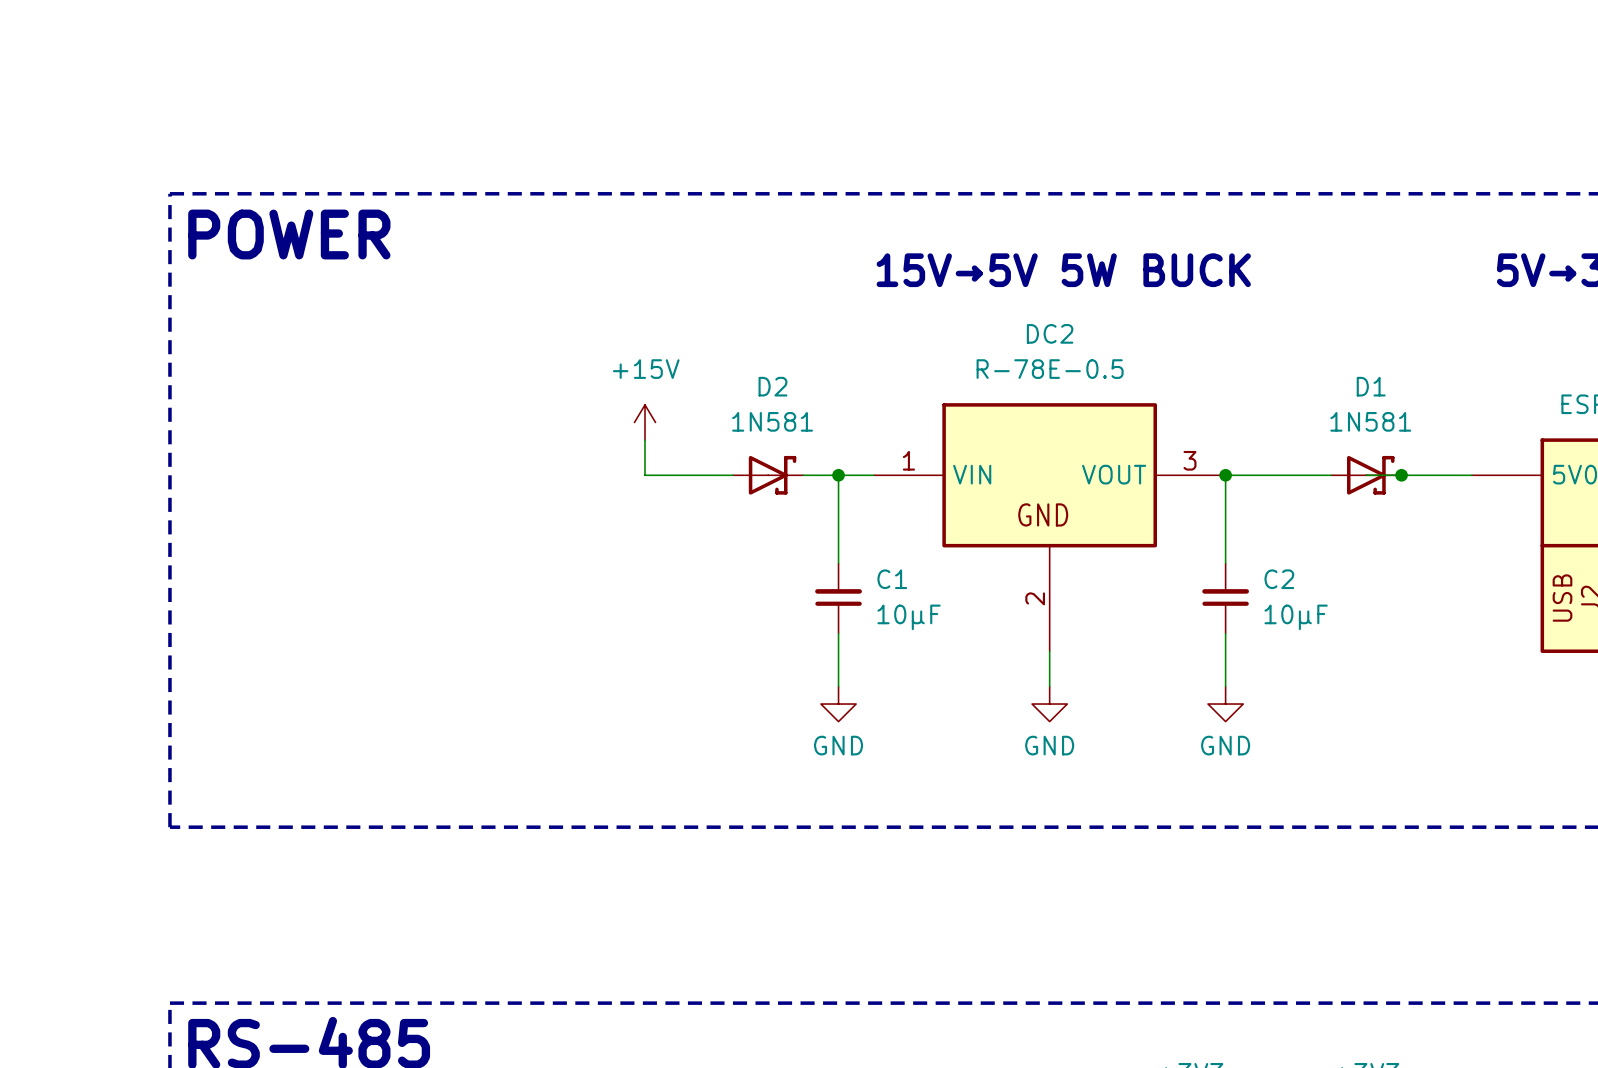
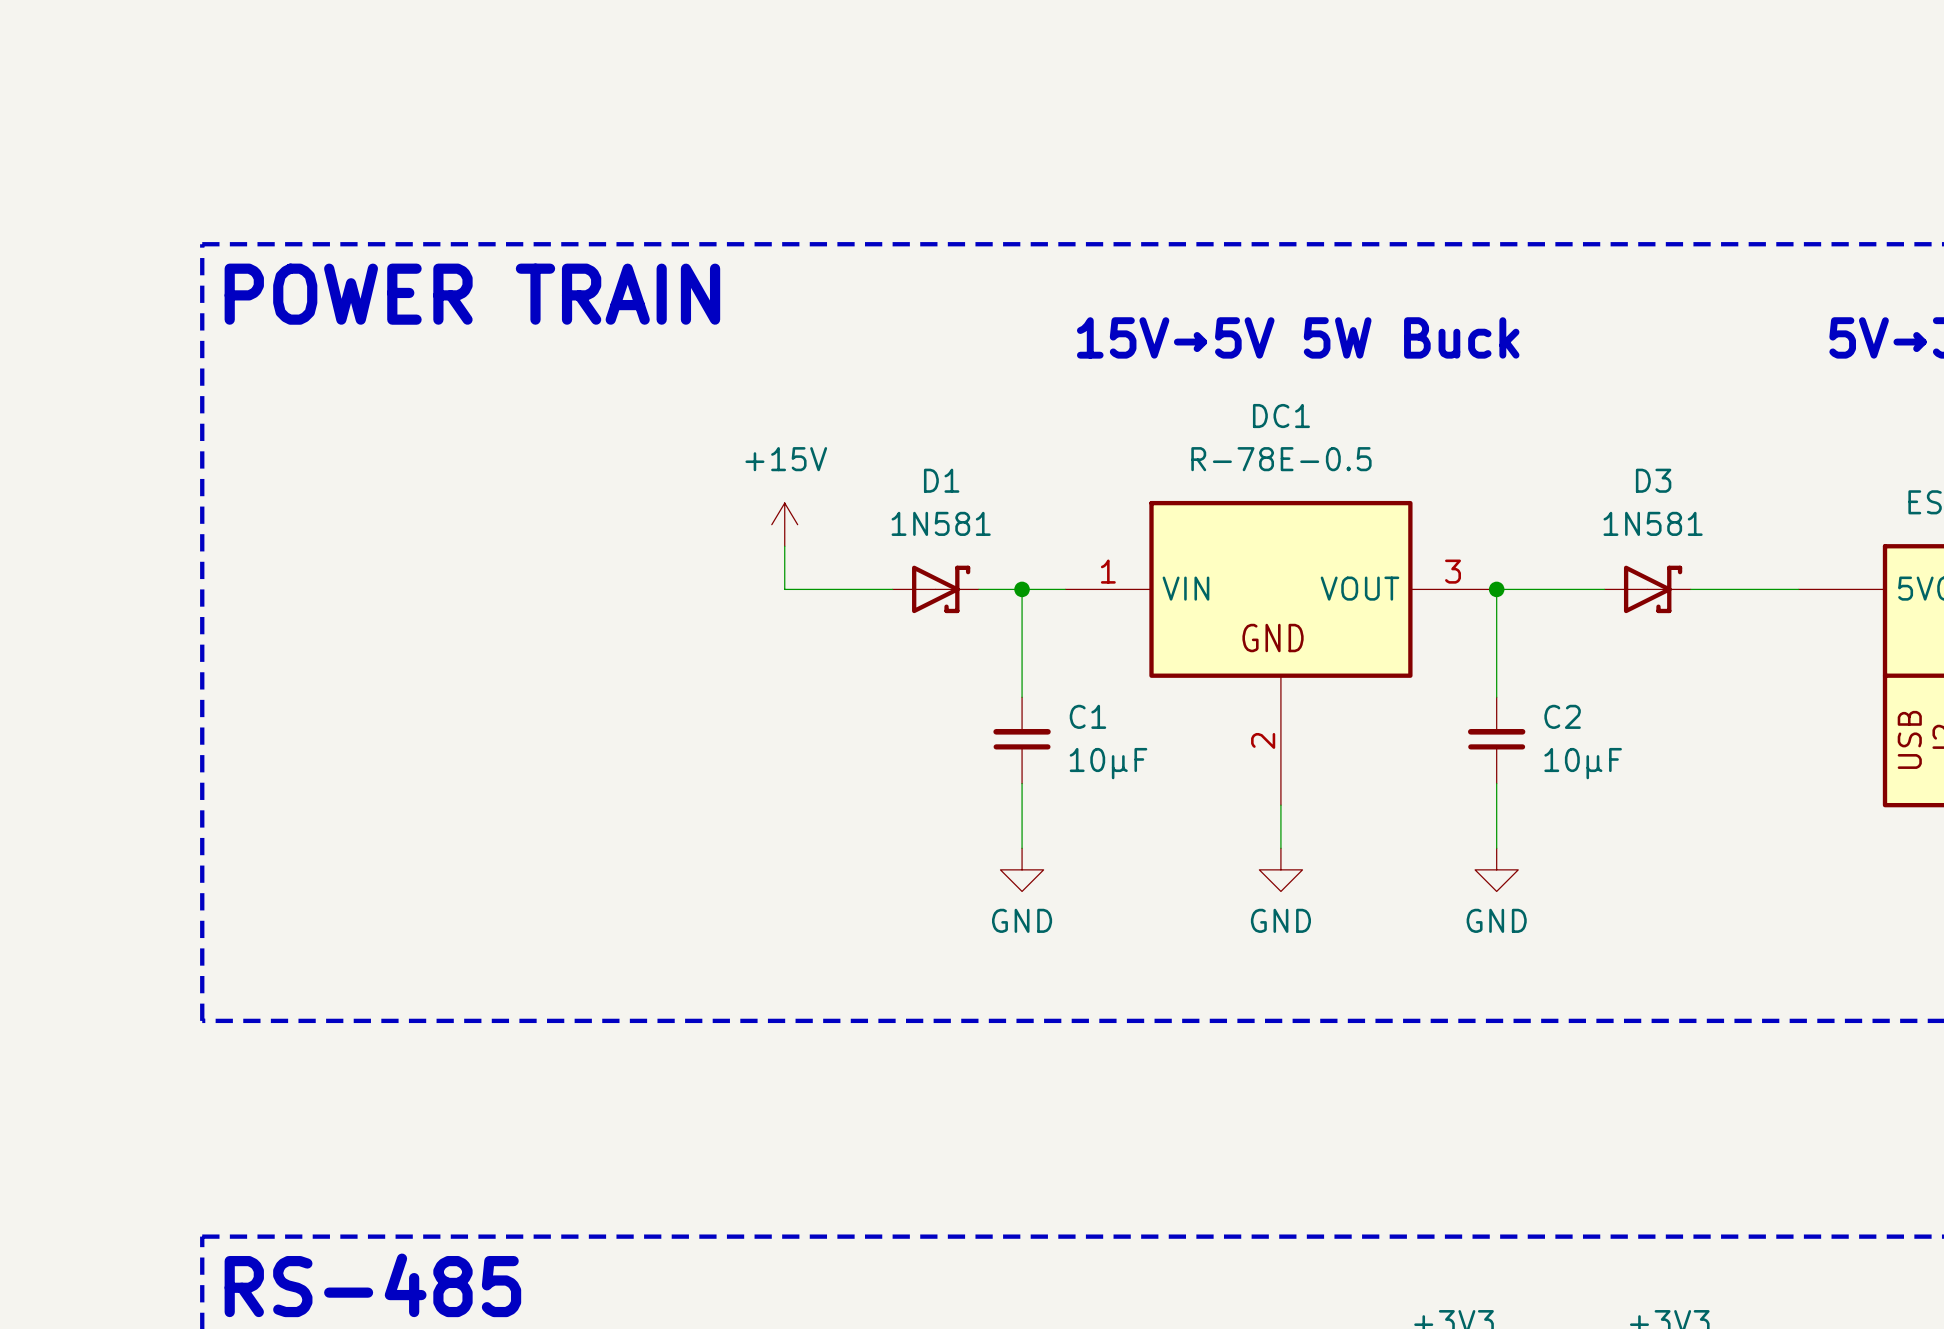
text: POWER (289, 234) -> POWER TRAIN (472, 294)
text: 15V→5V 5W BUCK (1063, 270) -> 15V→5V 5W Buck (1298, 337)
DC2 name: DC2 (1050, 333) -> DC1 (1281, 416)
D2 name: D2 (772, 386) -> D1 (941, 480)
D3: none -> 1N581 (1647, 589)
D1: 1N581 (1366, 475) -> none
junction: (1401, 475) -> none

